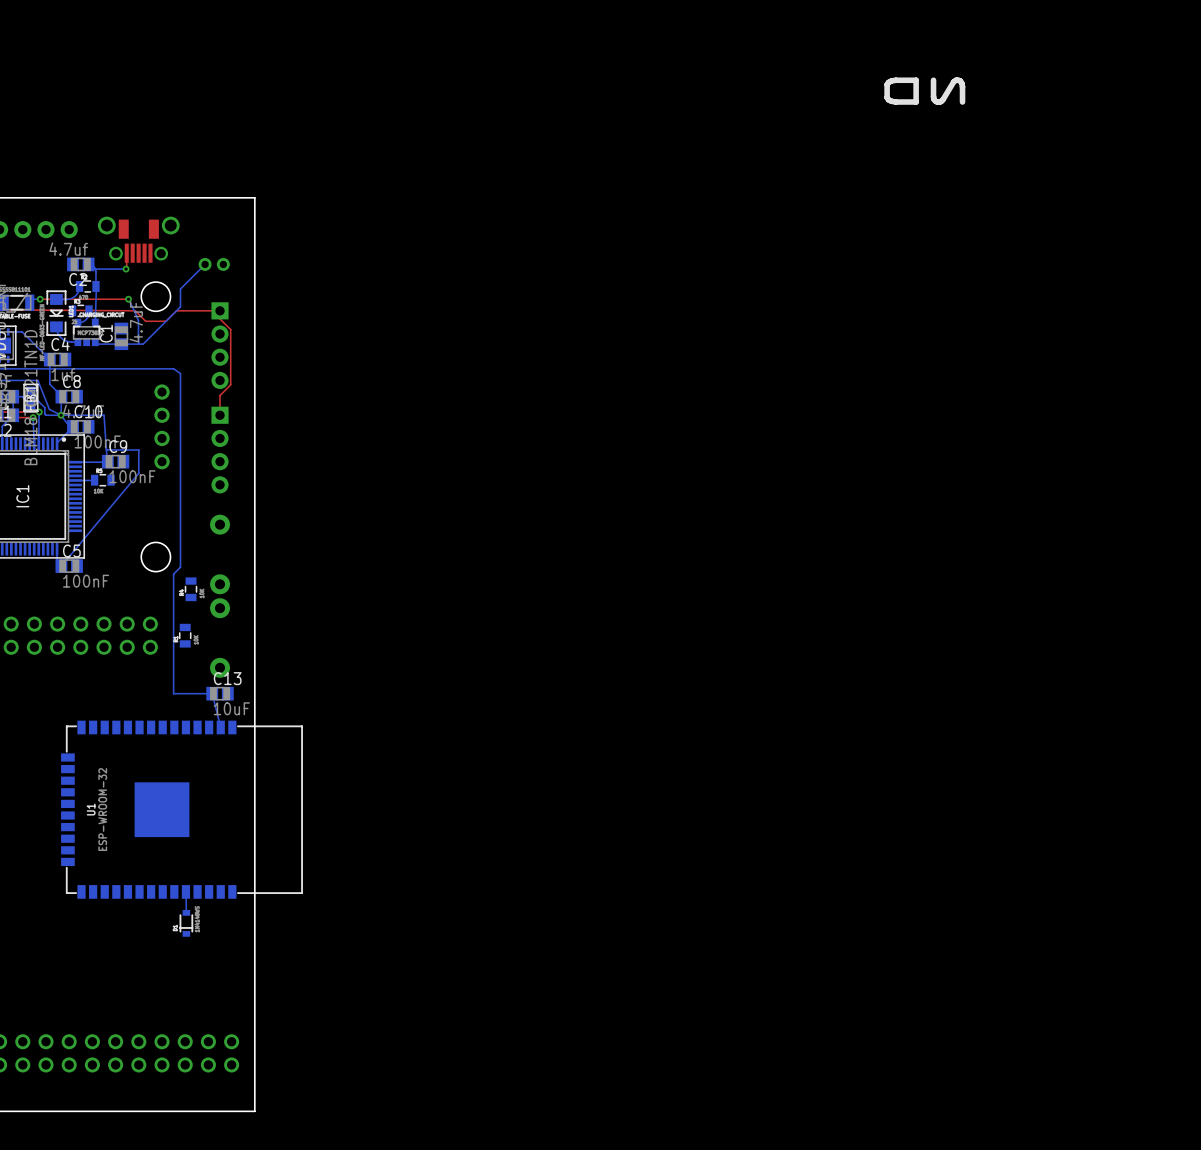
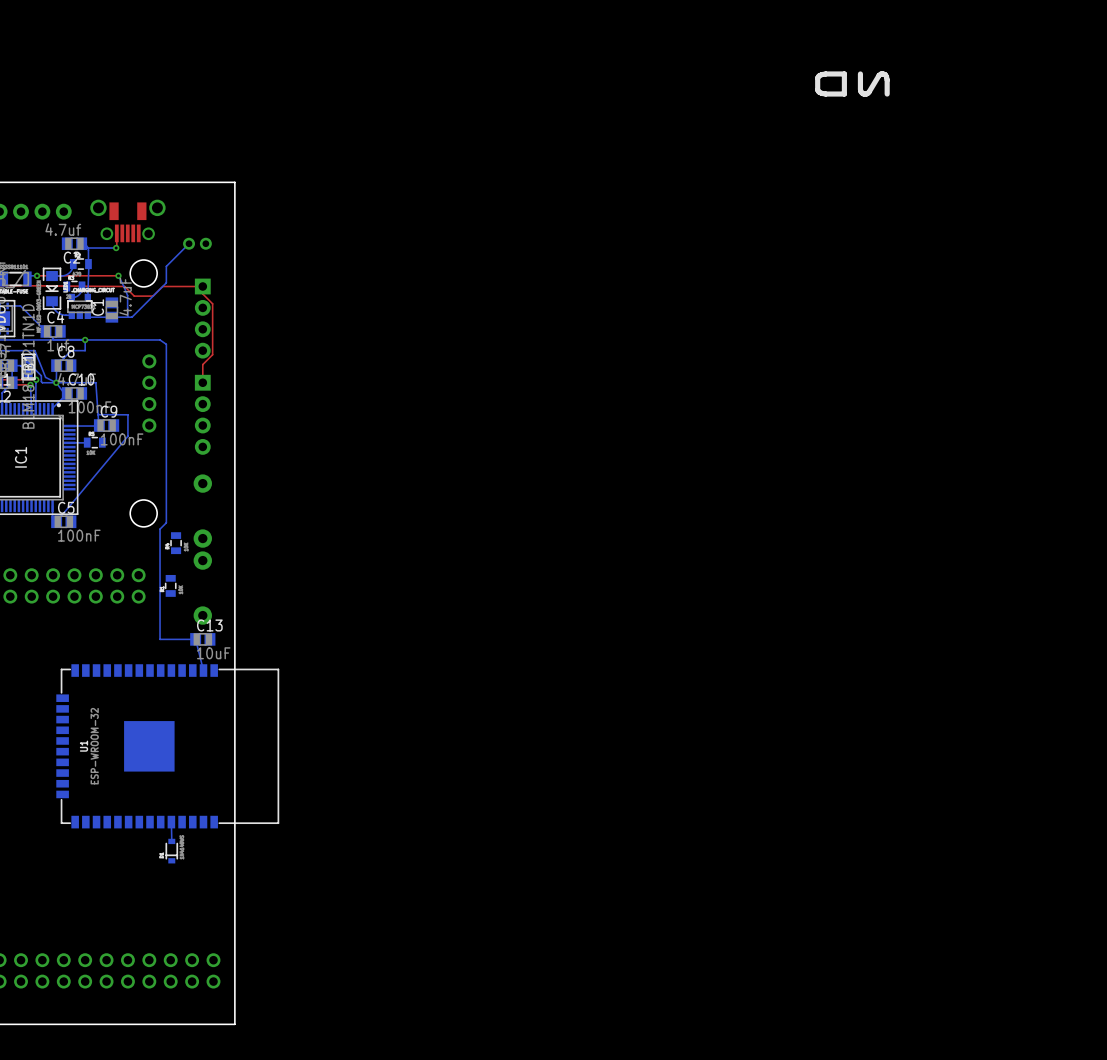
bottom track: (49, 359) (49, 384) (57, 392) -> (45, 331) (53, 339) (85, 339) (85, 350) (71, 350) (56, 365)
via: none -> (85, 339)

